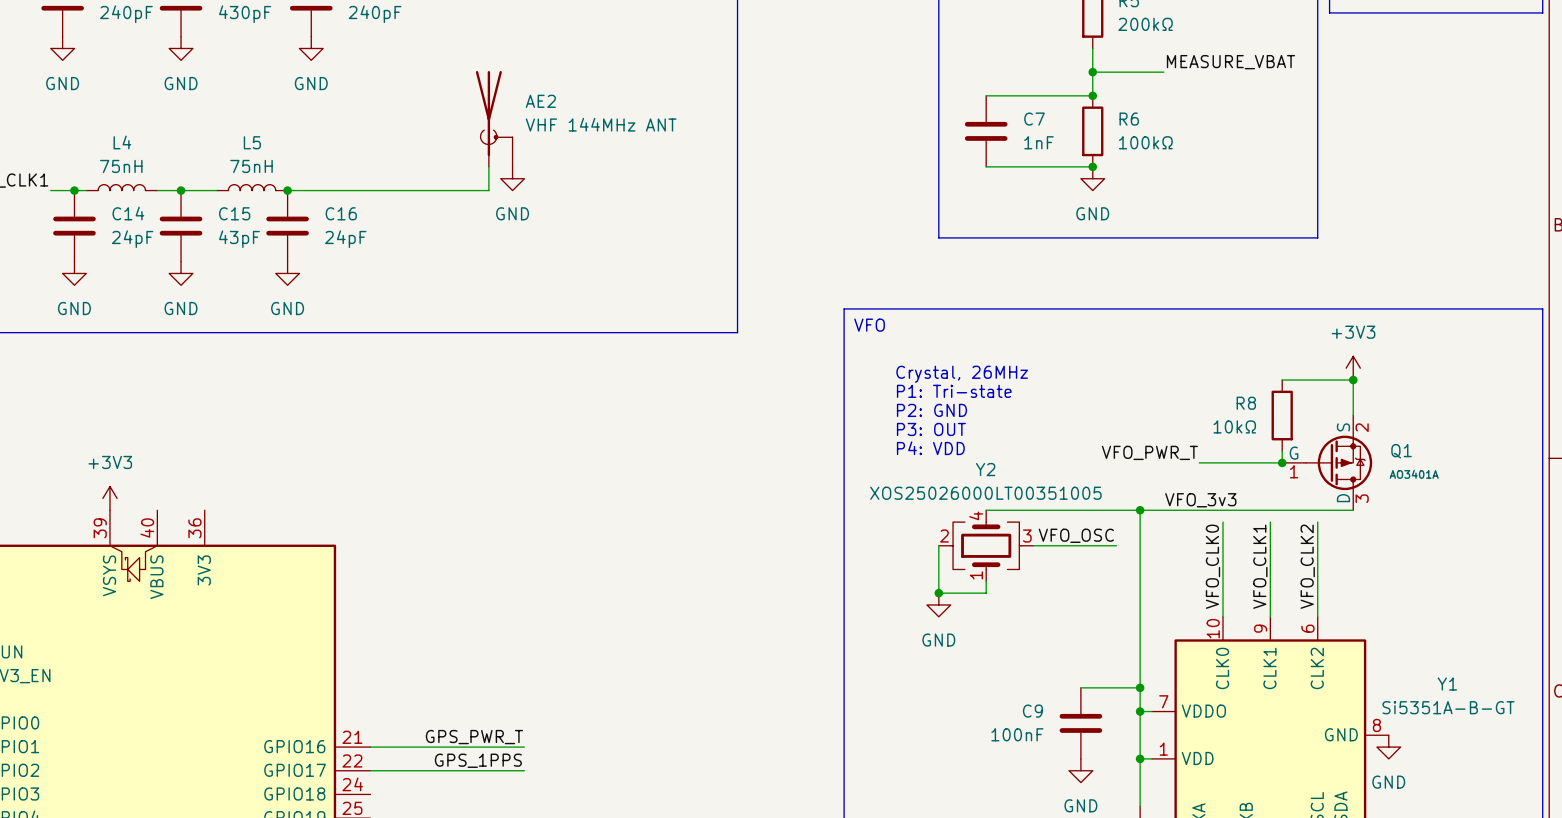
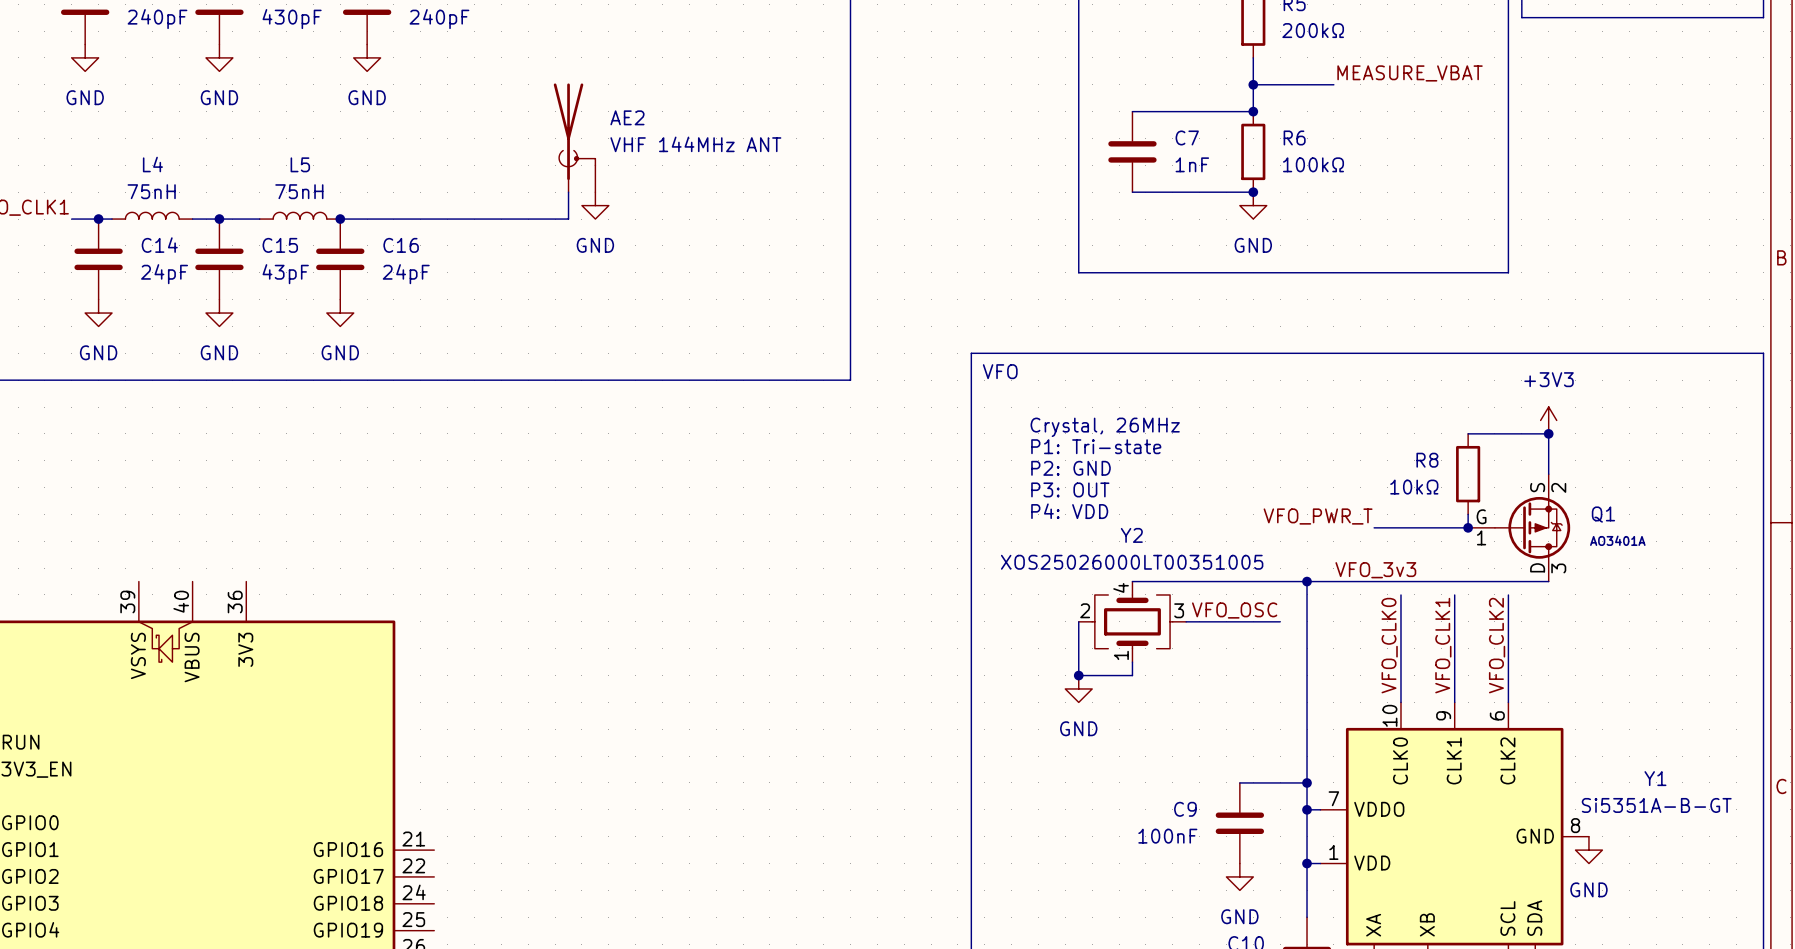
power symbol: +3V3 (109, 498) -> none
label: GPS_PWR_T (474, 737) -> none
wire: (370, 747) (524, 747) -> none
label: GPS_1PPS (478, 760) -> none
wire: (370, 770) (524, 770) -> none

